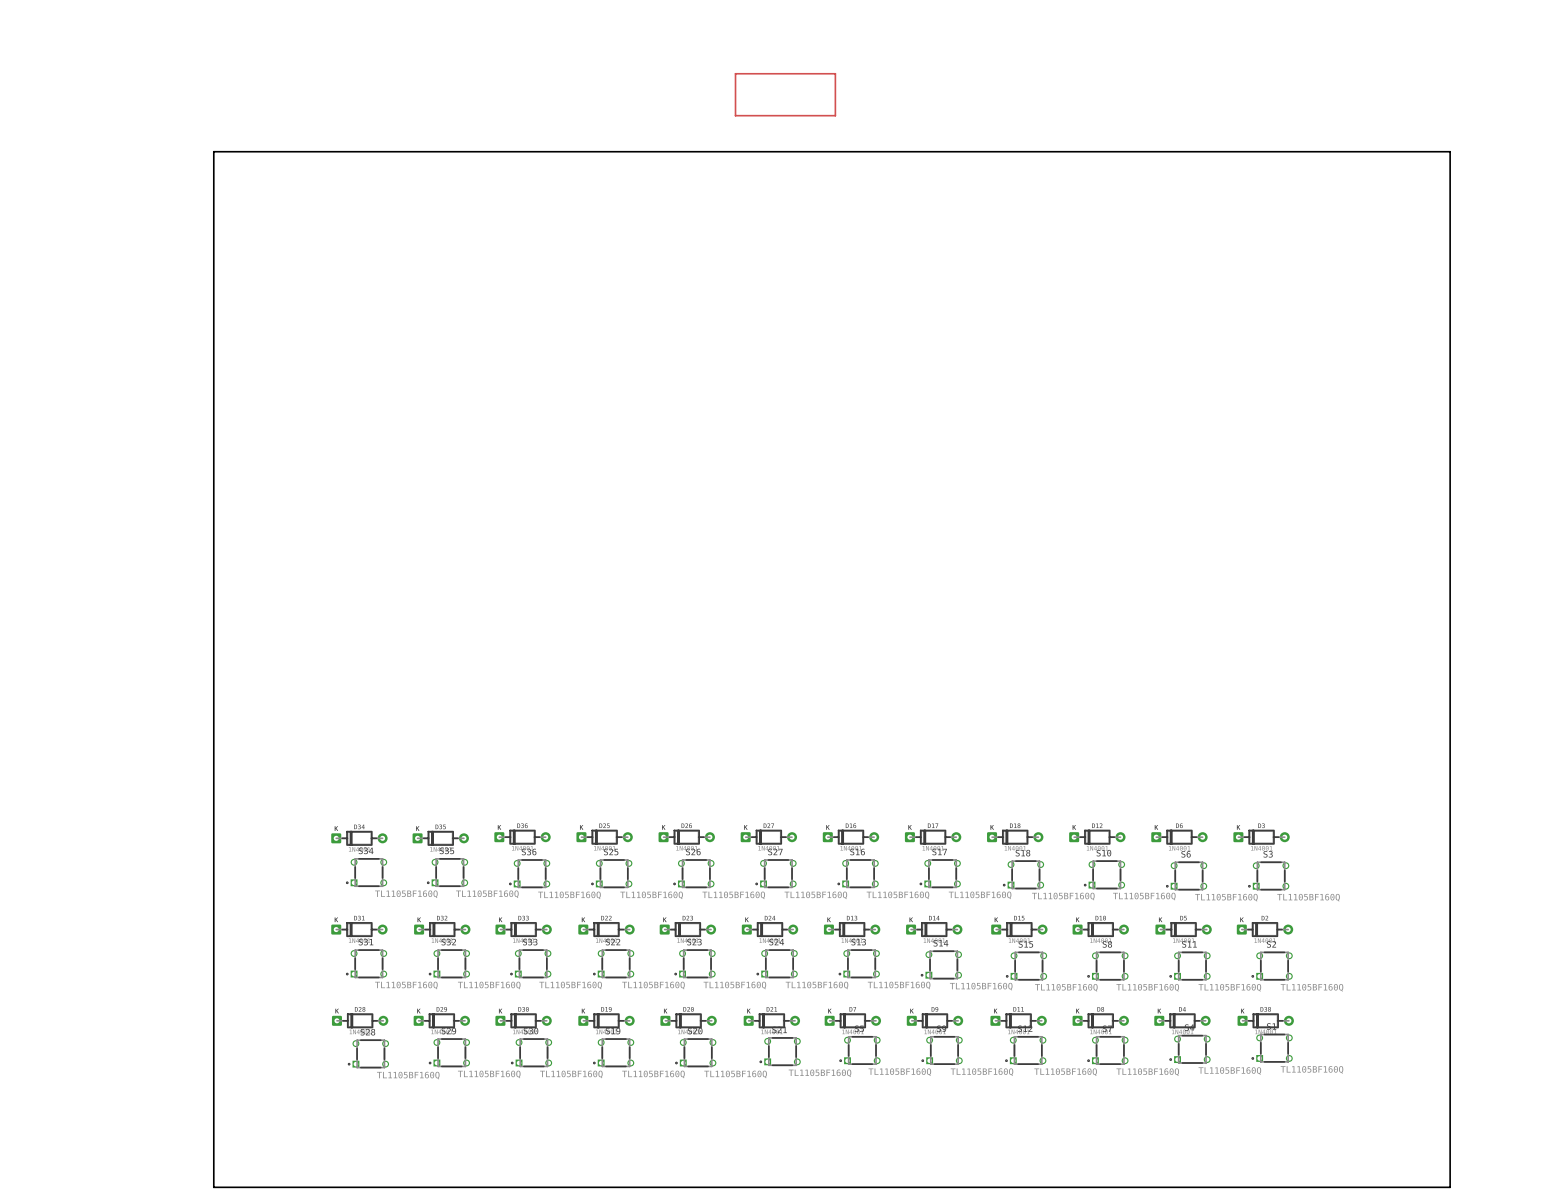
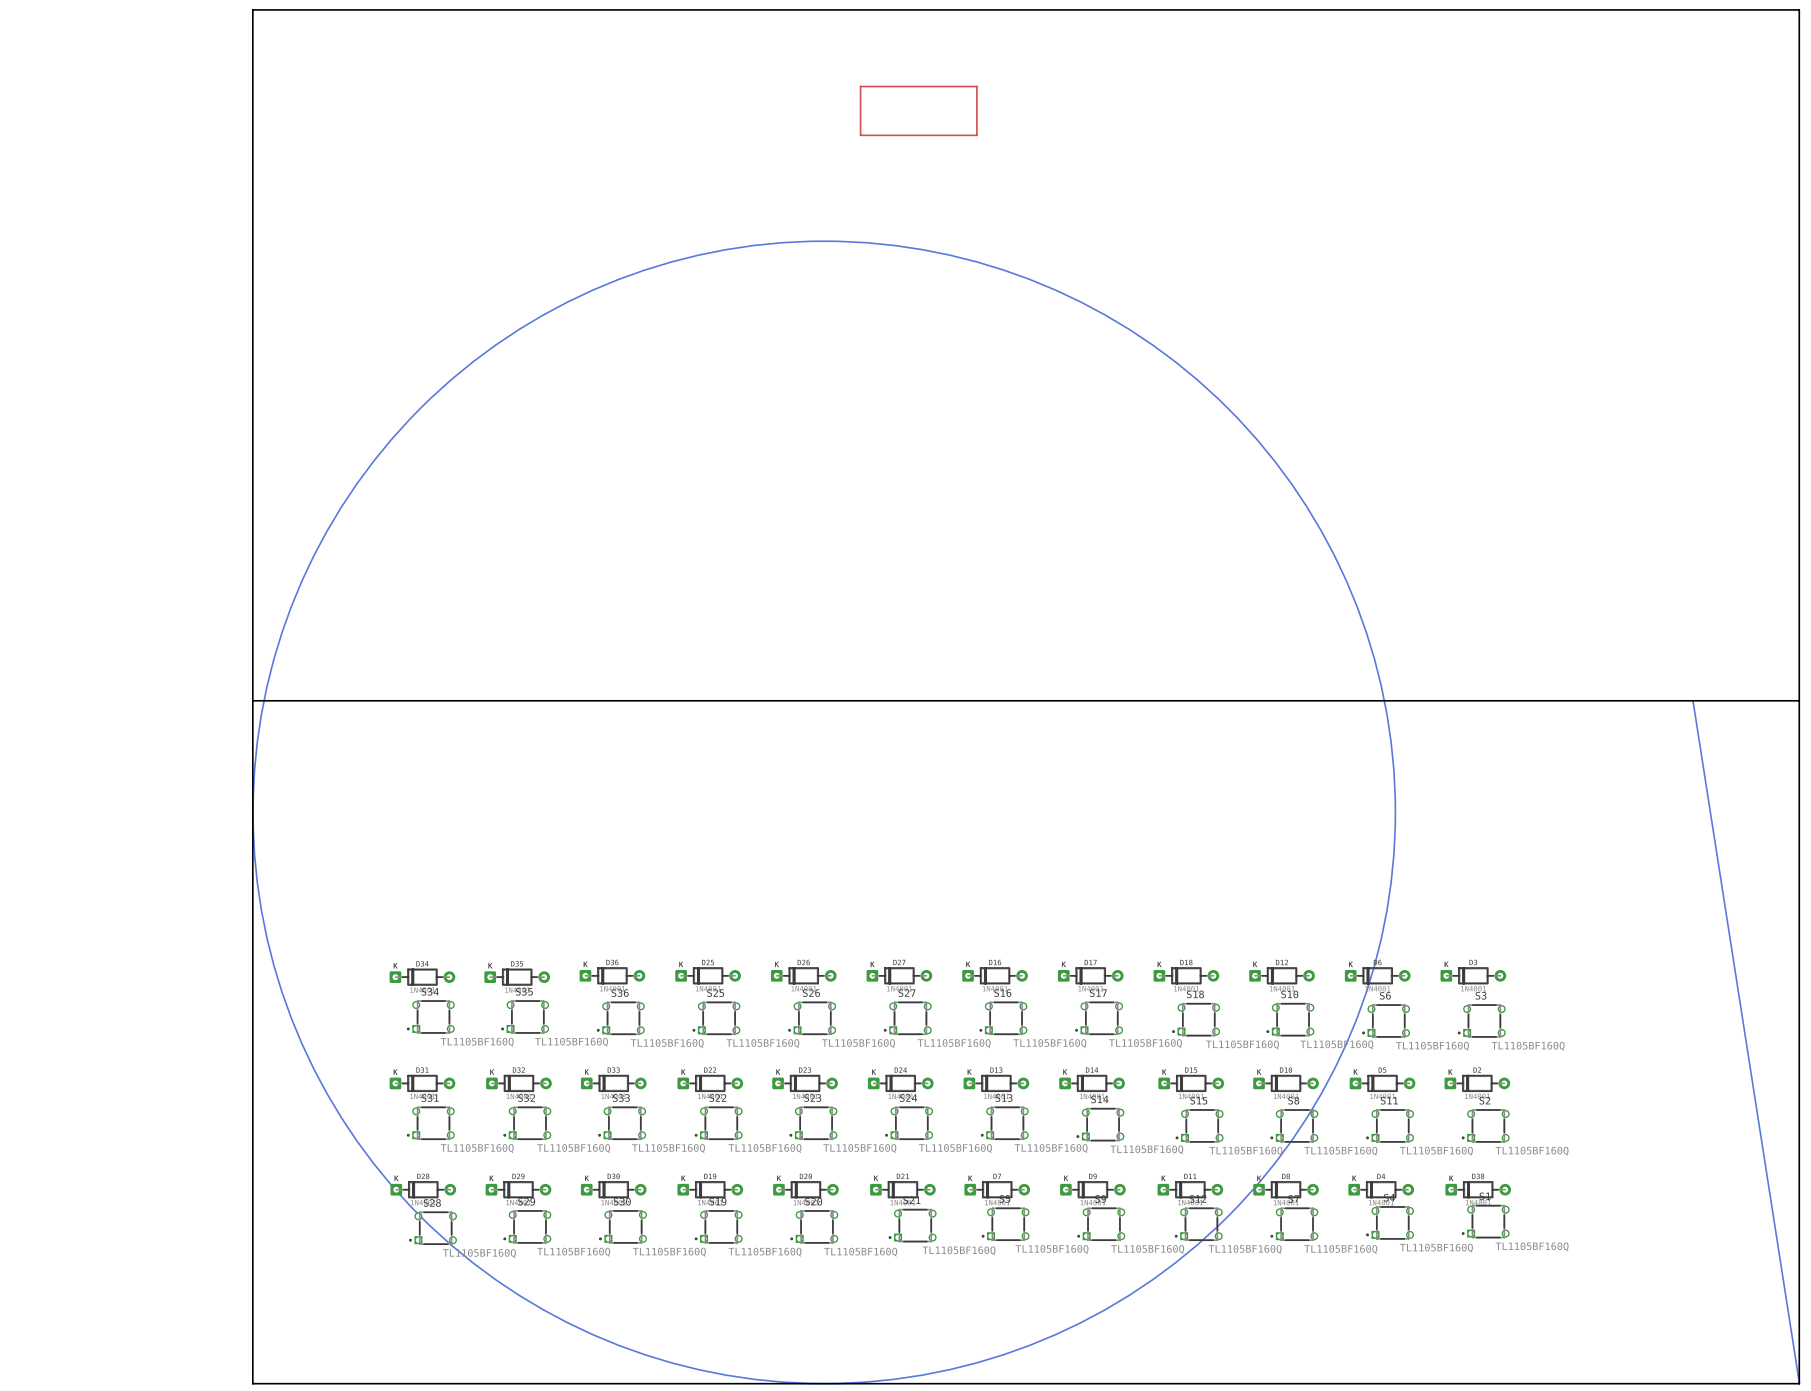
board edge: (213, 151) (1450, 151) (1450, 1187) -> (252, 177) (252, 9) (1799, 9) (1799, 1383) (1693, 1383)
drawing: none -> [252, 240, 1396, 1385]
board edge: none -> (252, 700) (1799, 700)
bottom track: none -> (1693, 700) (1799, 1383)

